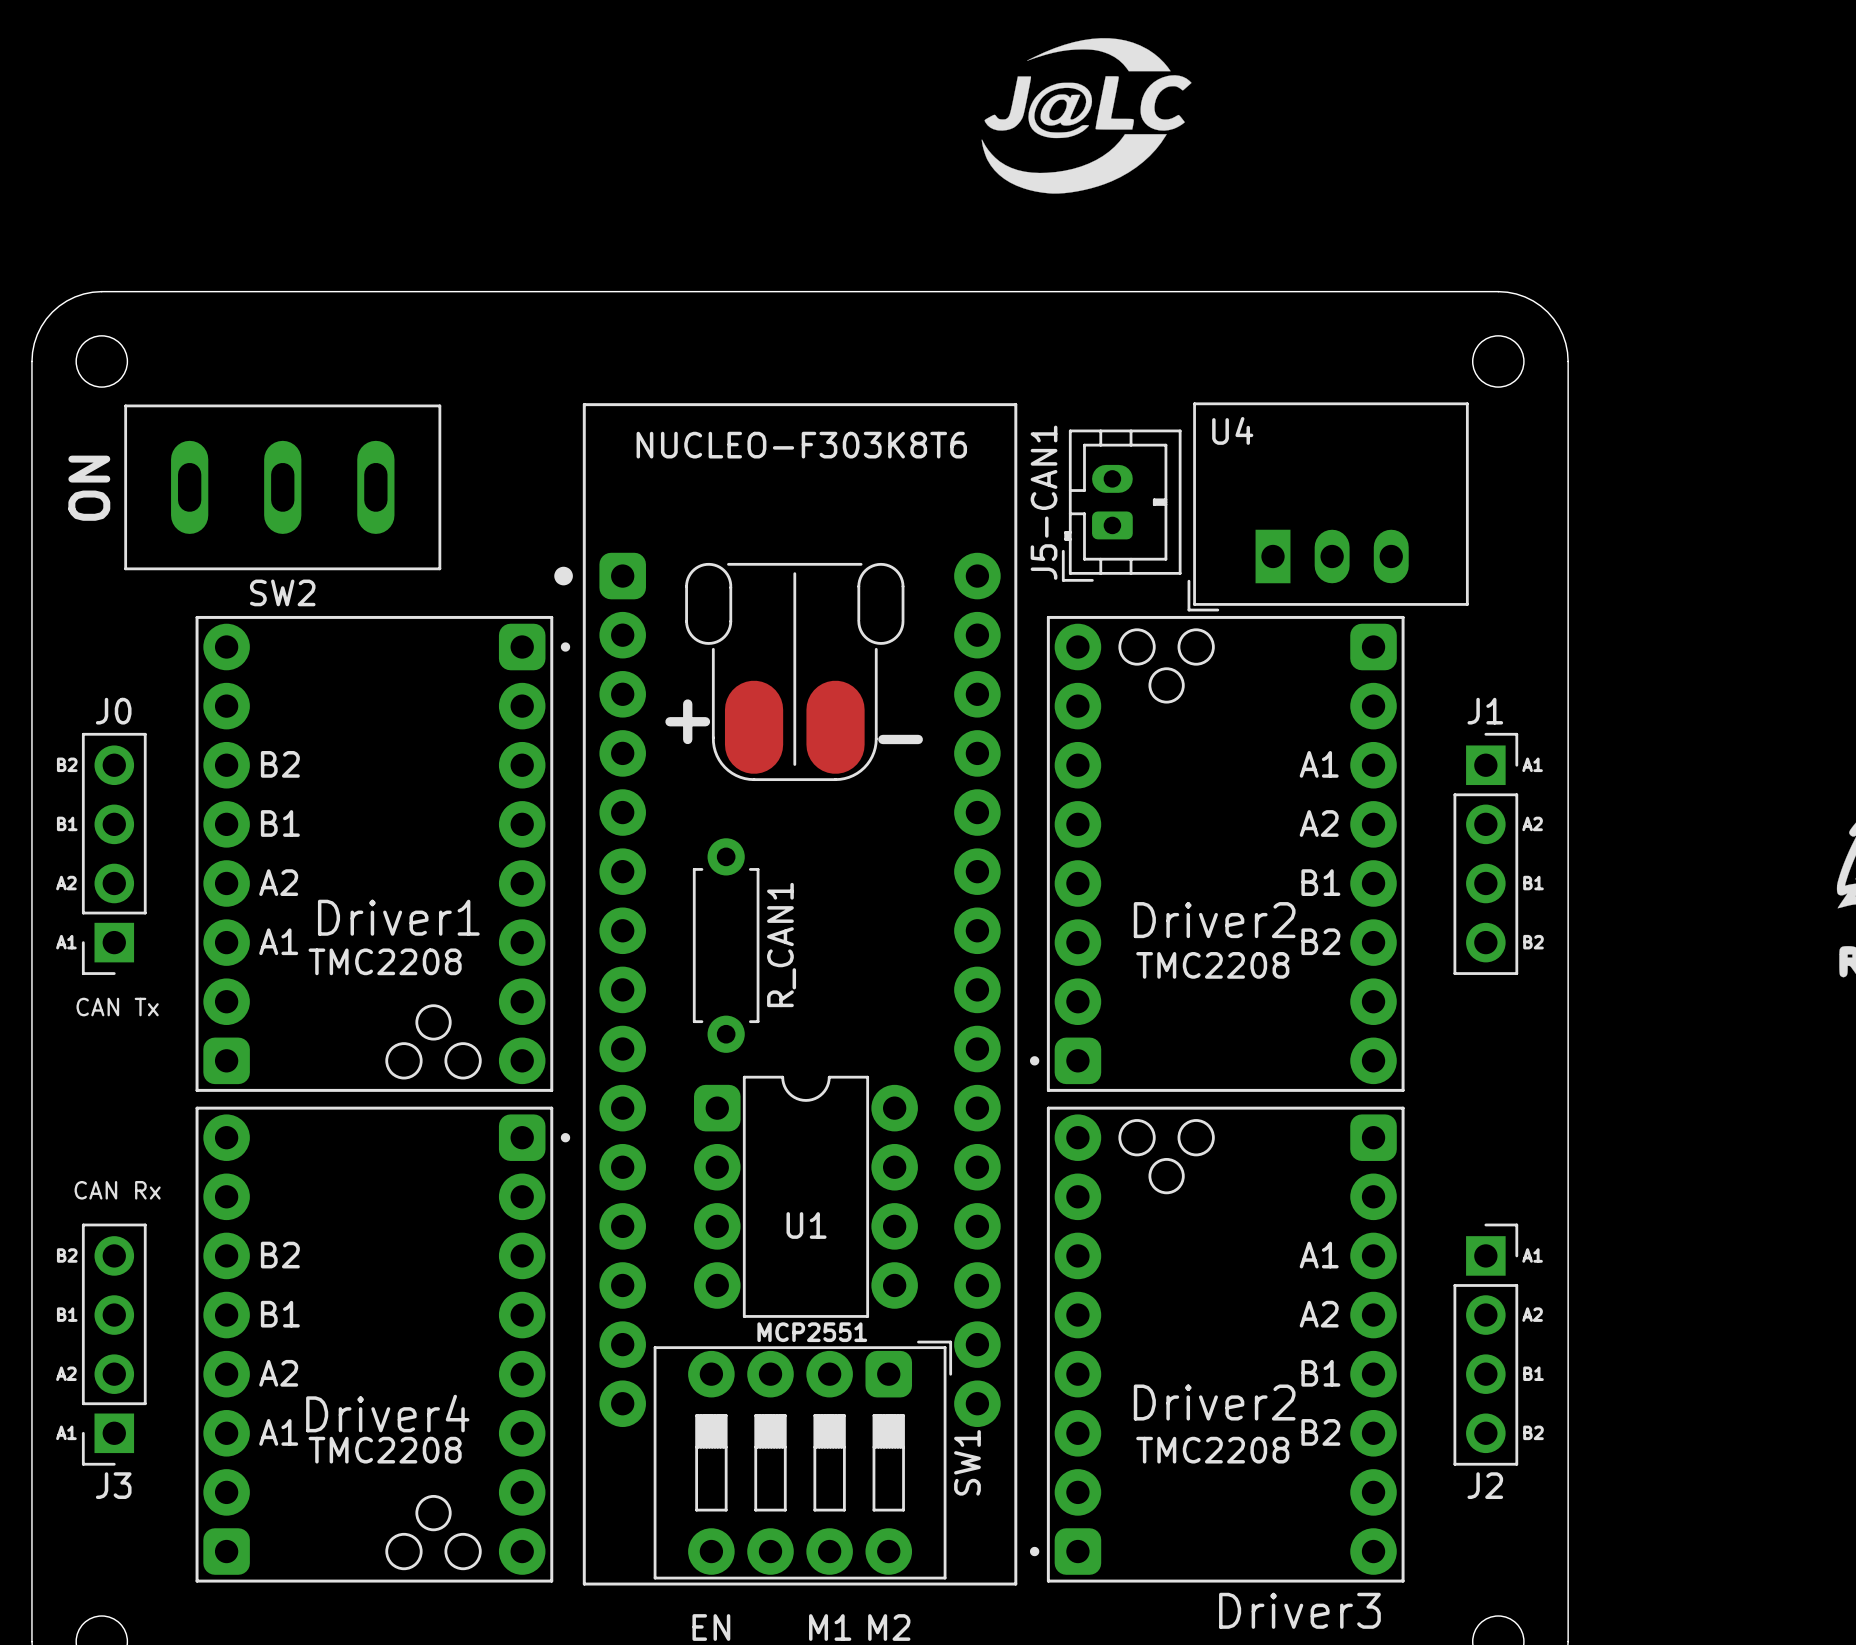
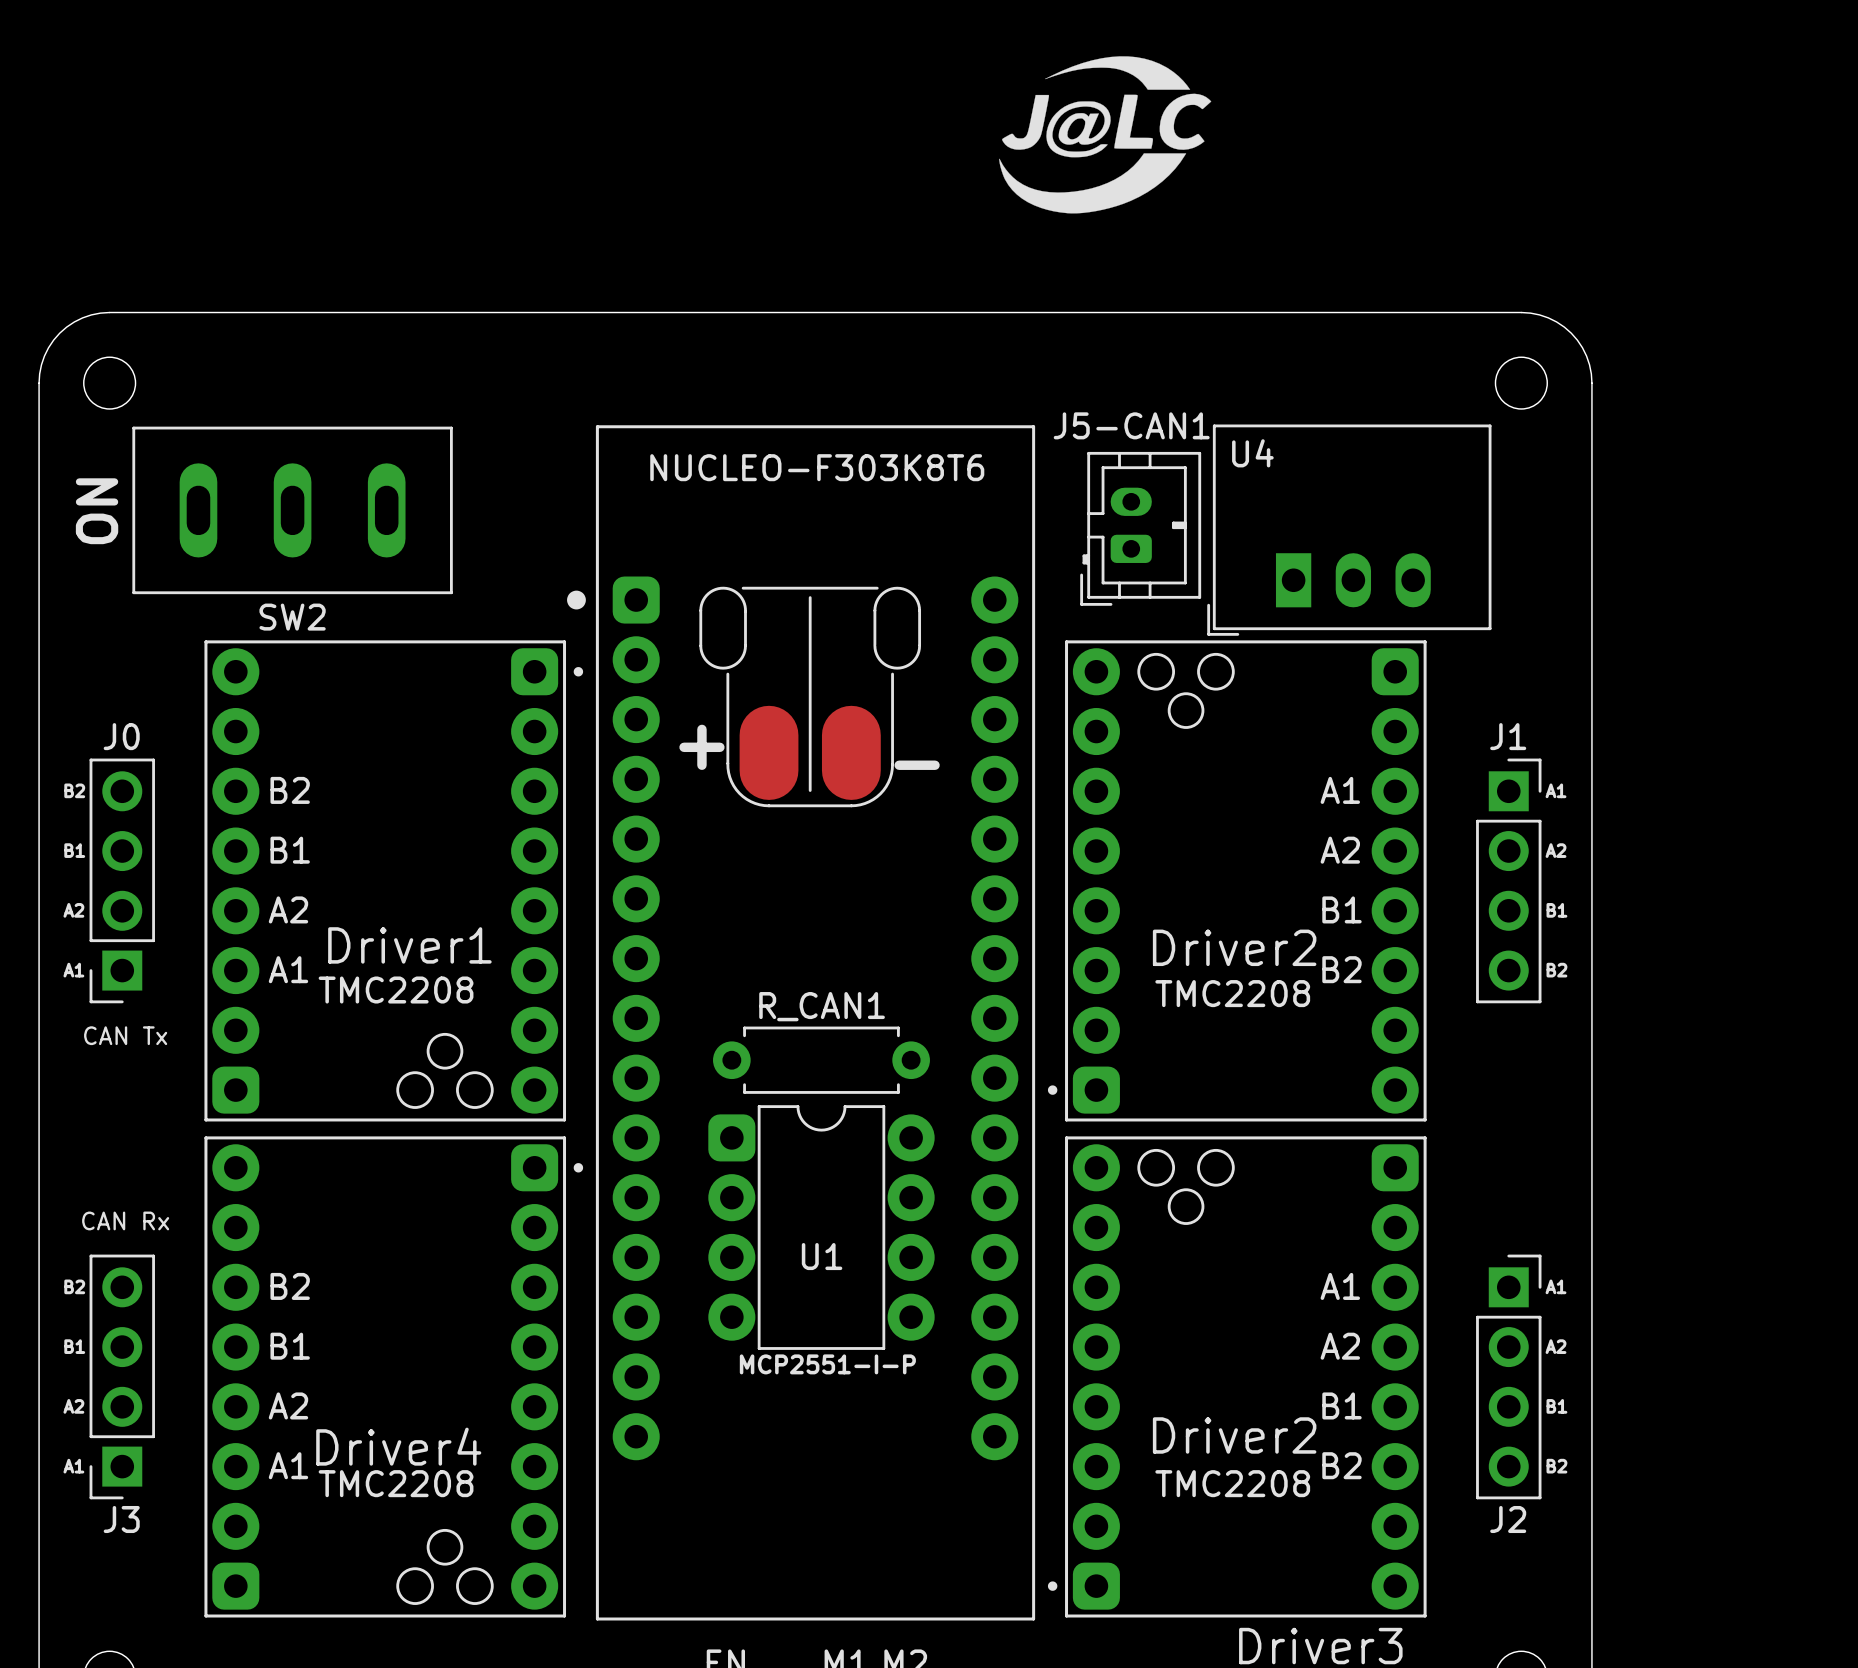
J5-CAN1 name rotation: 0° (1044, 502) -> 90° clockwise (1131, 425)
R_CAN1 rotation: 0° (726, 945) -> 90° clockwise (821, 1060)
R_CAN1 name position: R_CAN1 (781, 945) -> R_CAN1 (822, 1006)
U1 value: MCP2551 (812, 1332) -> MCP2551-I-P (827, 1364)
SW1: (802, 1460) -> none

